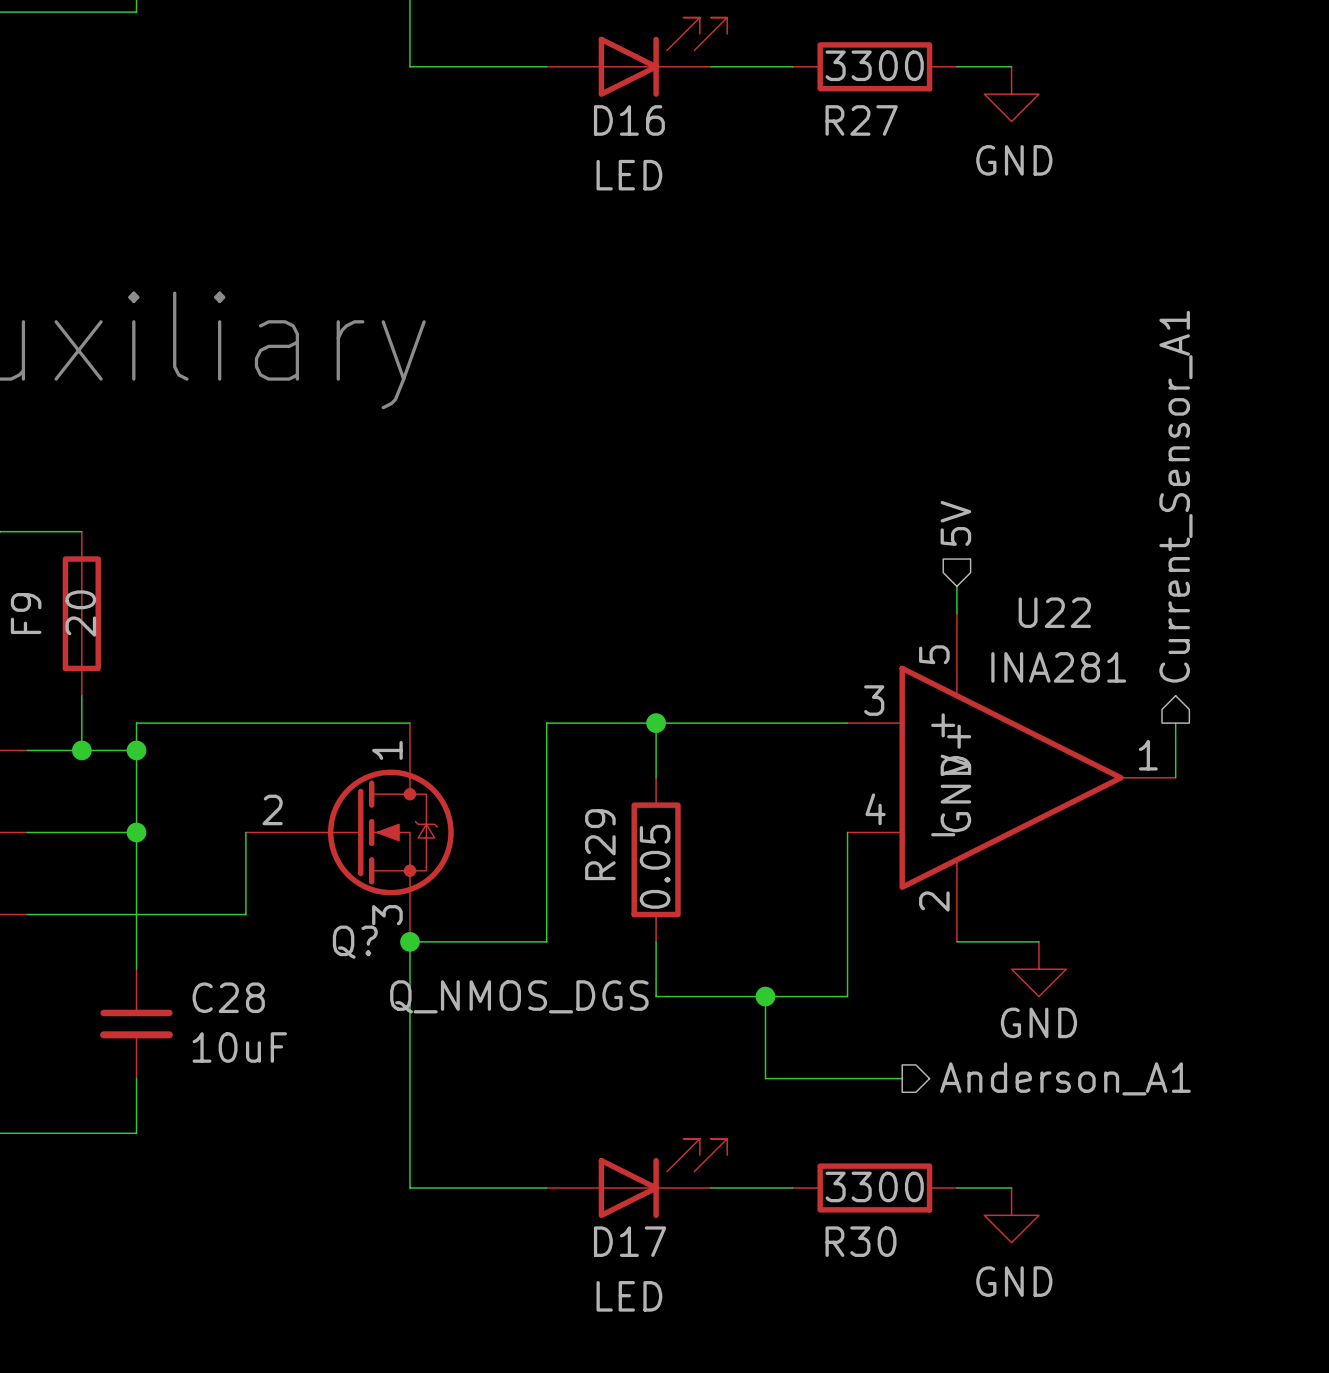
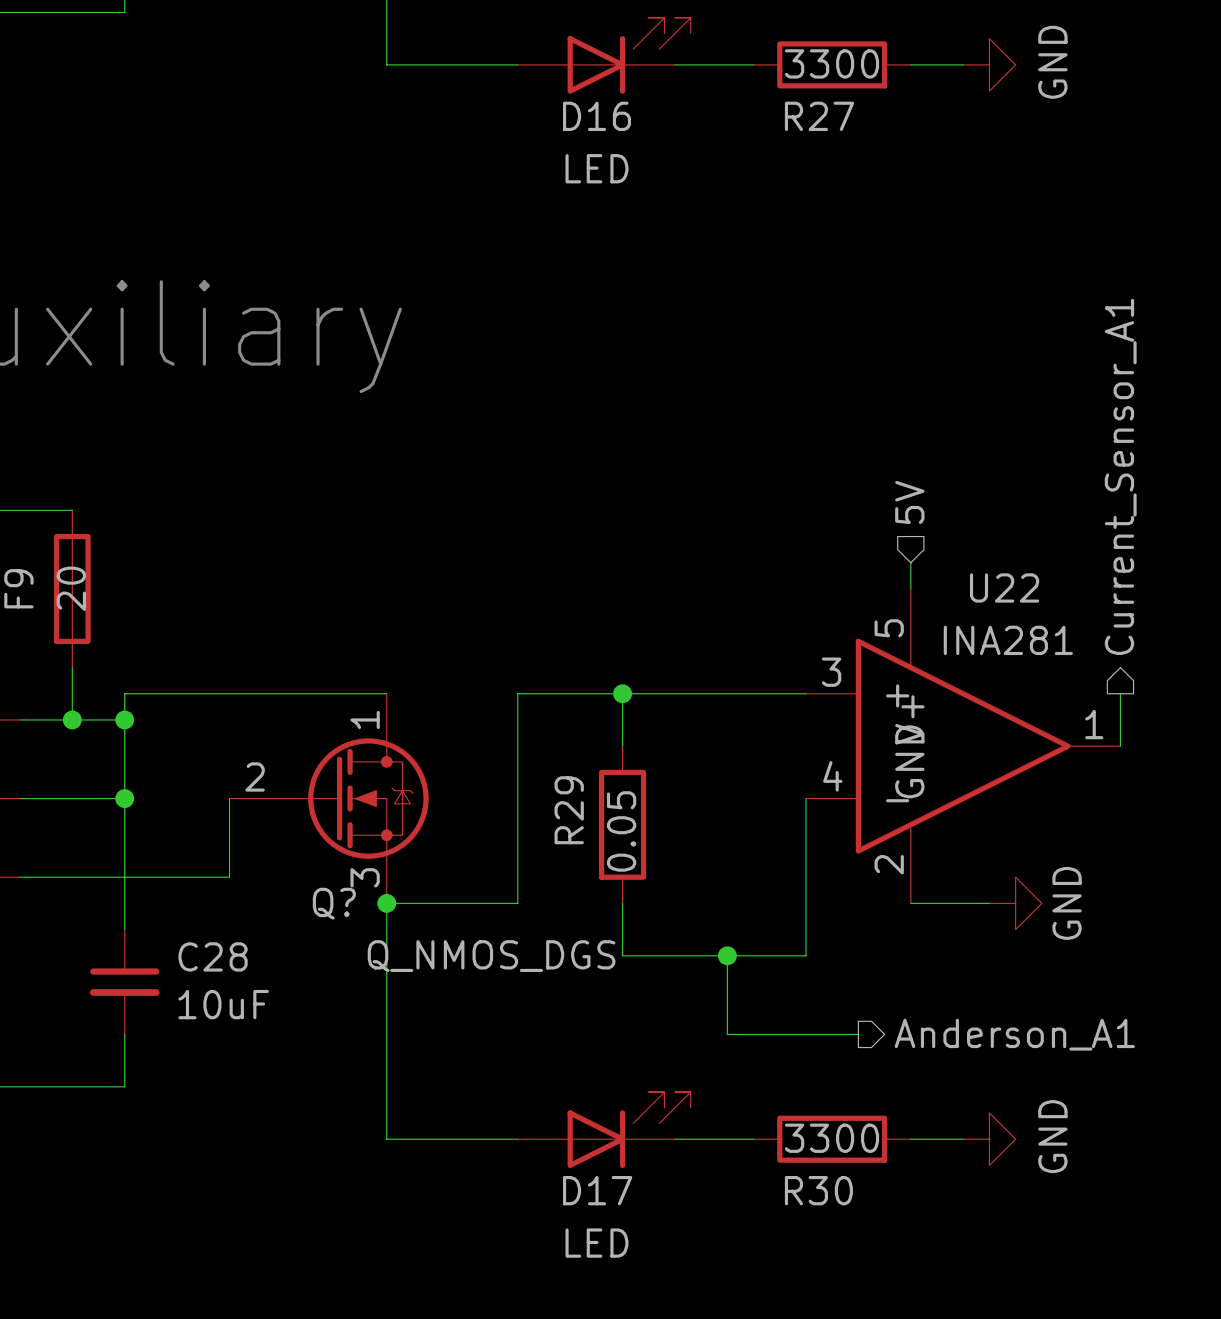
power symbol rotation: 0° (1011, 94) -> 90° counterclockwise (989, 64)
power symbol position: GND (1011, 94) -> GND (989, 64)
power symbol rotation: 0° (1038, 969) -> 90° counterclockwise (1015, 903)
power symbol position: GND (1038, 969) -> GND (1015, 903)
power symbol rotation: 0° (1011, 1215) -> 90° counterclockwise (989, 1139)
power symbol position: GND (1011, 1215) -> GND (989, 1139)

